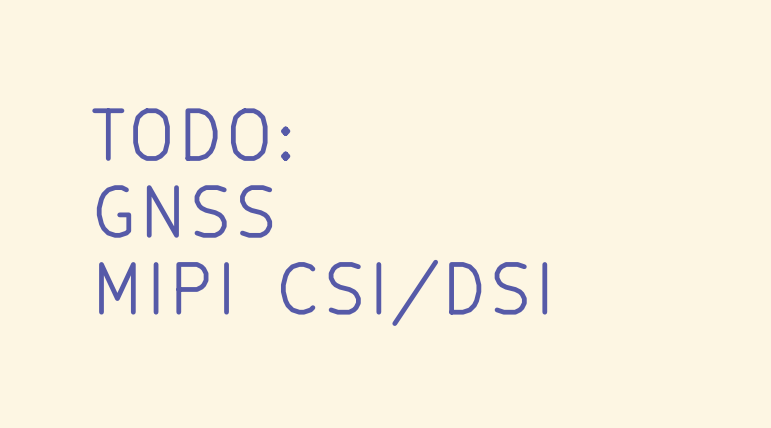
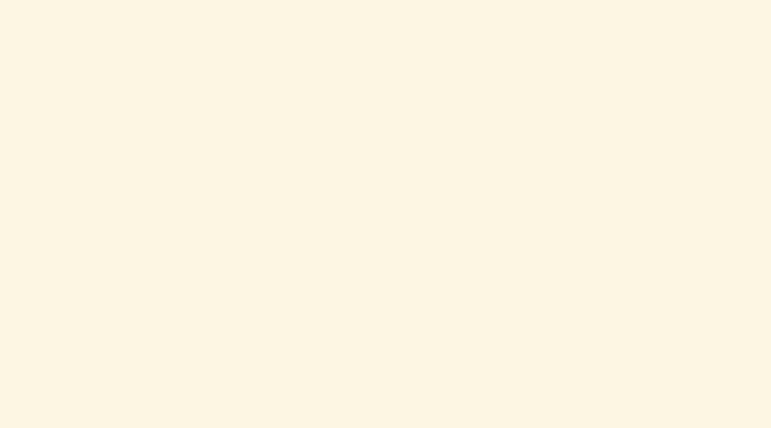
text: TODO: (191, 134) -> none
text: GNSS (184, 211) -> none
text: MIPI CSI/DSI (323, 292) -> none

